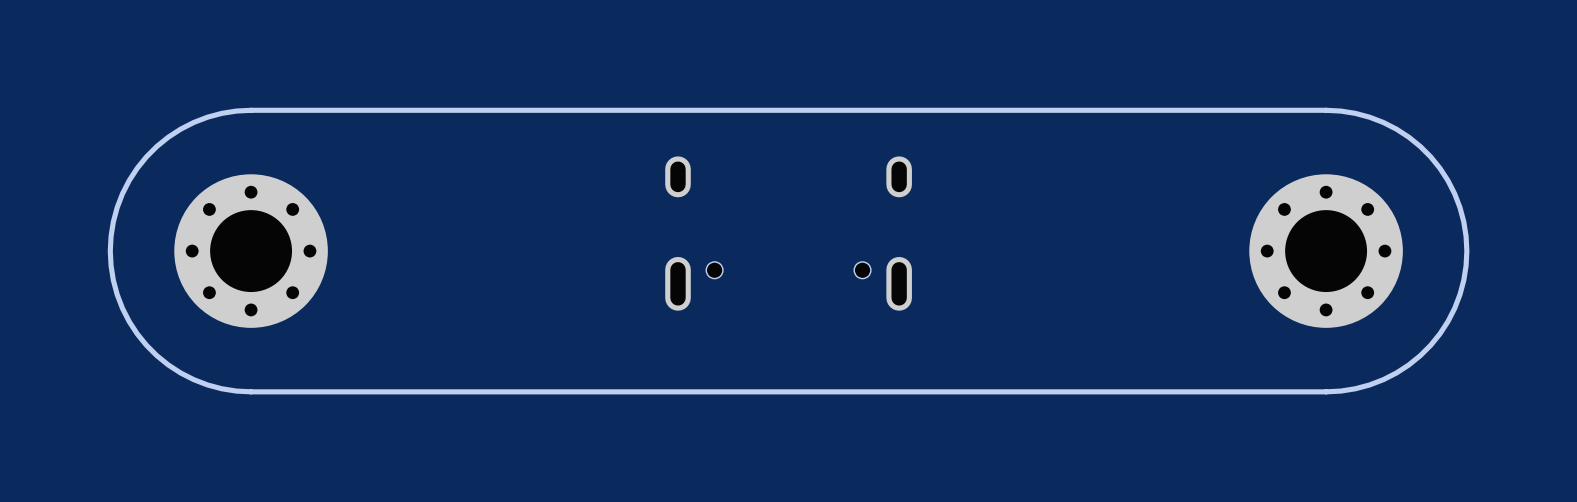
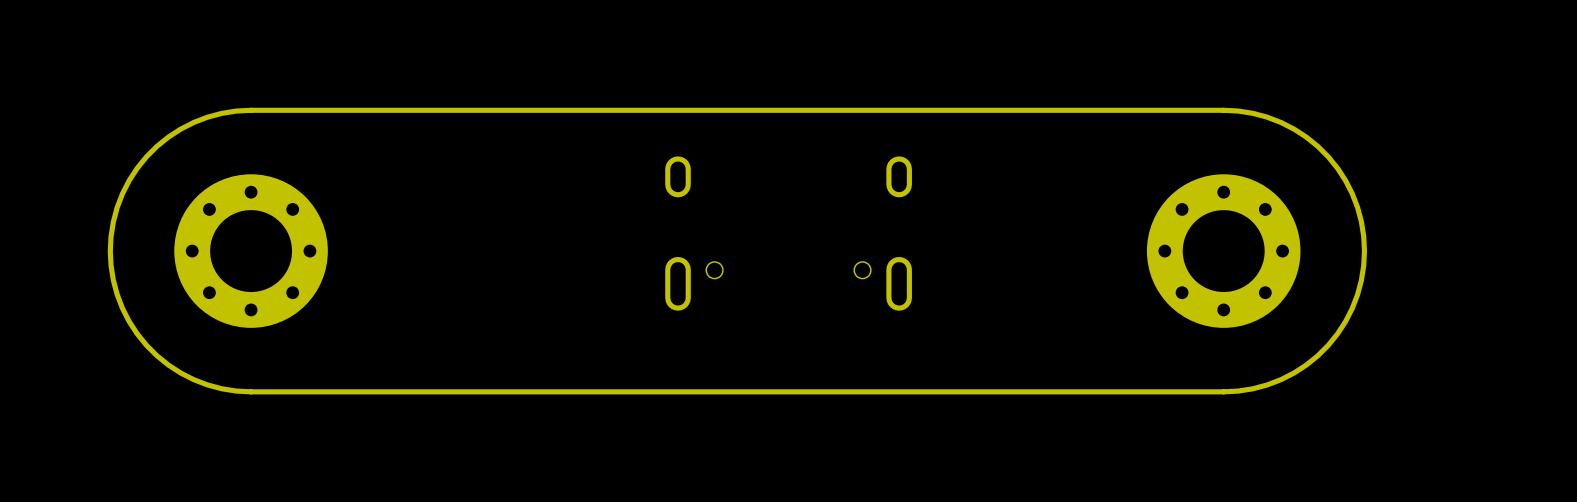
board edge: (1223, 110) (1340, 111) (1369, 117) (1396, 129) (1408, 137) (1430, 156) (1448, 180) (1454, 193) (1463, 221) (1466, 251) (1463, 280) (1459, 294) (1448, 321) (1430, 345) (1408, 364) (1396, 372) (1369, 384) (1340, 391) (1223, 391) -> (1223, 110) (1252, 113) (1280, 122) (1306, 137) (1328, 156) (1345, 180) (1352, 193) (1361, 221) (1364, 251) (1361, 280) (1352, 308) (1337, 333) (1328, 345) (1306, 364) (1280, 379) (1252, 388) (1223, 391)
part position: (1326, 251) -> (1223, 251)

